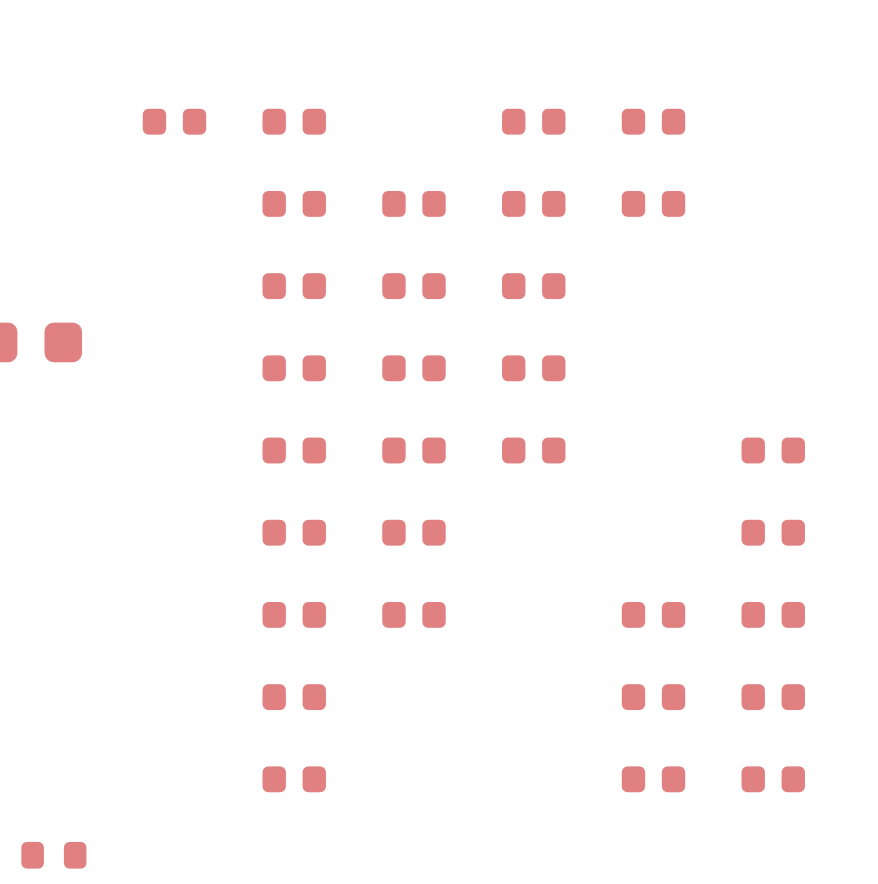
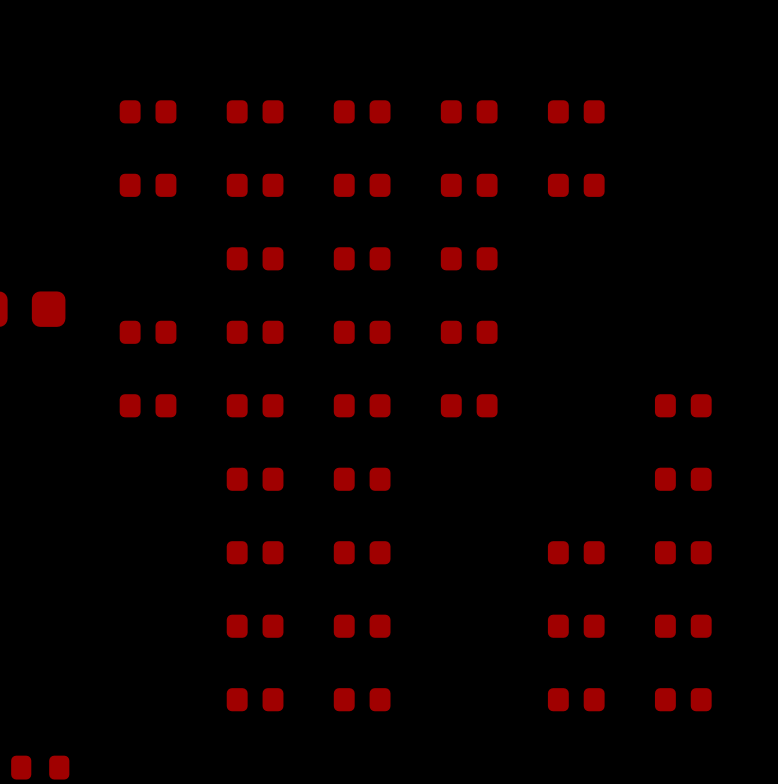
part: none -> (362, 111)
part: none -> (148, 185)
part: none -> (148, 332)
part: none -> (148, 405)
part: none -> (362, 626)
part: none -> (362, 699)

